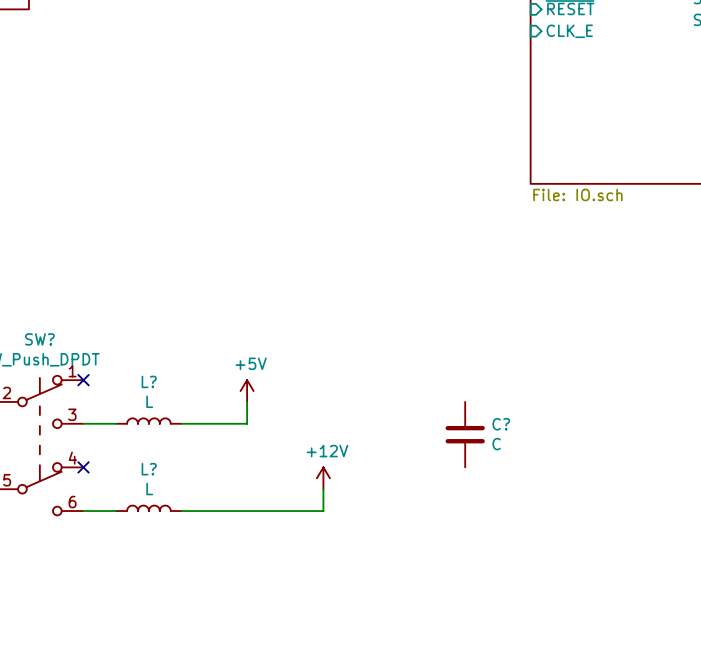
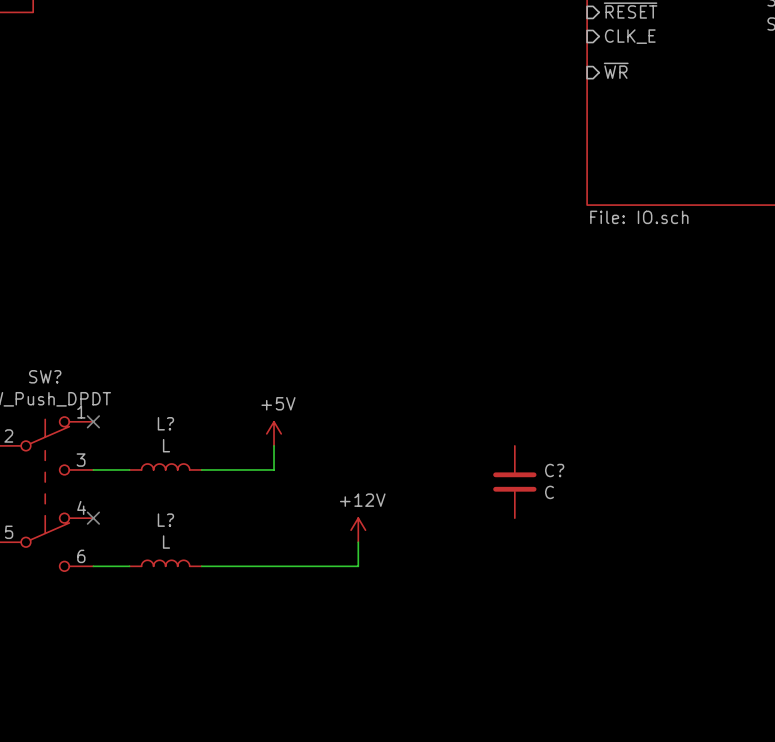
sheet pin: none -> ~{WR} (616, 70)

